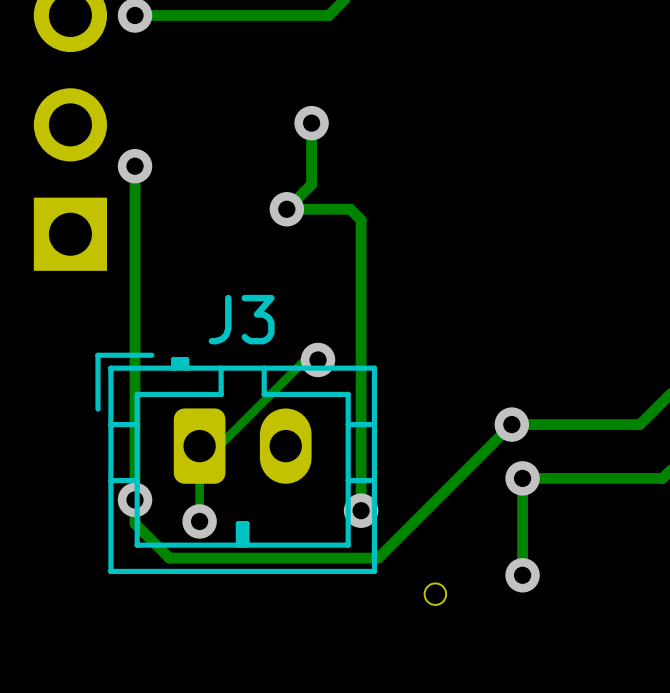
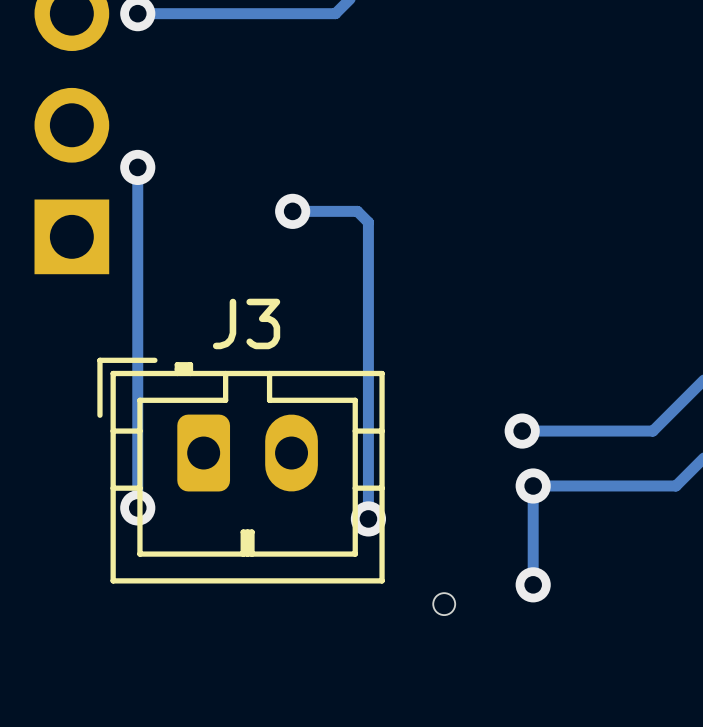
track: (311, 123) (311, 184) (286, 209) -> none
via: (311, 123) -> none
track: (318, 359) (305, 359) (199, 465) (199, 521) -> none
via: (318, 359) -> none
track: (511, 424) (378, 558) (169, 558) (135, 523) (135, 499) -> none
via: (199, 521) -> none

